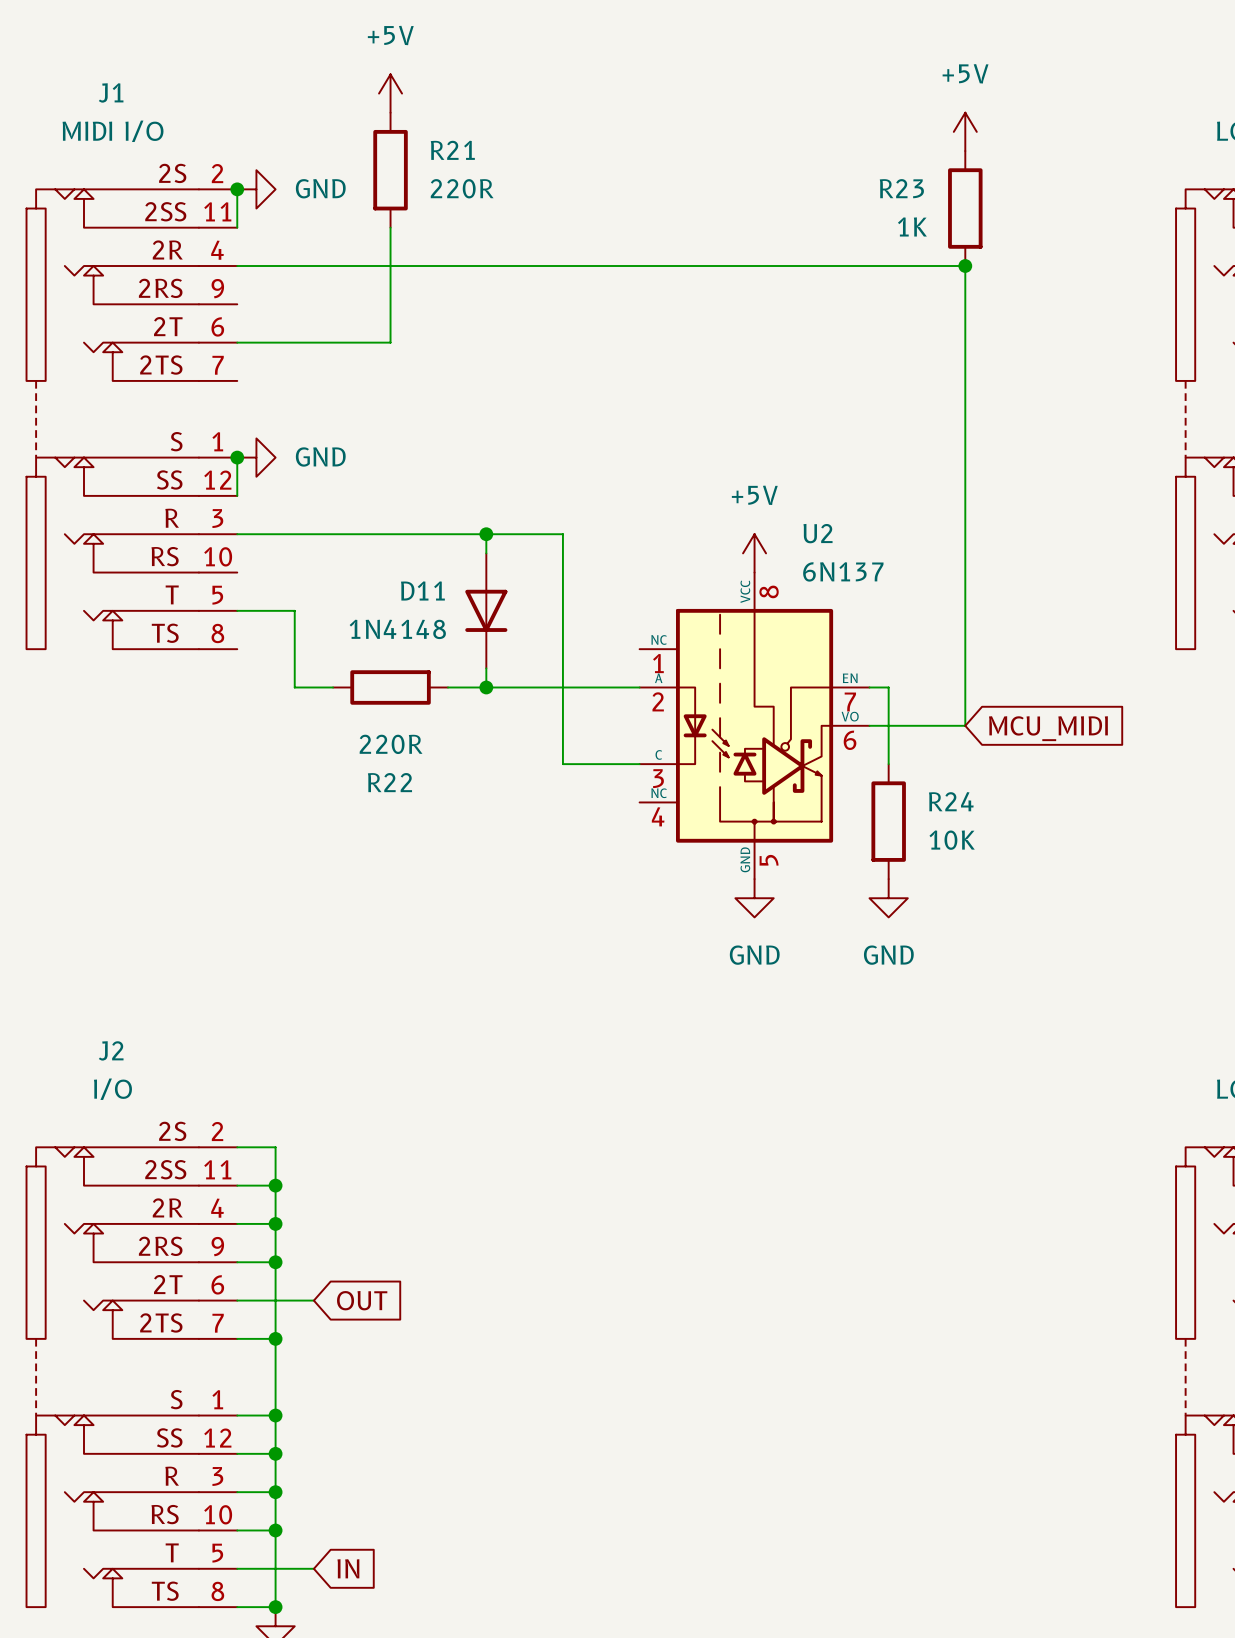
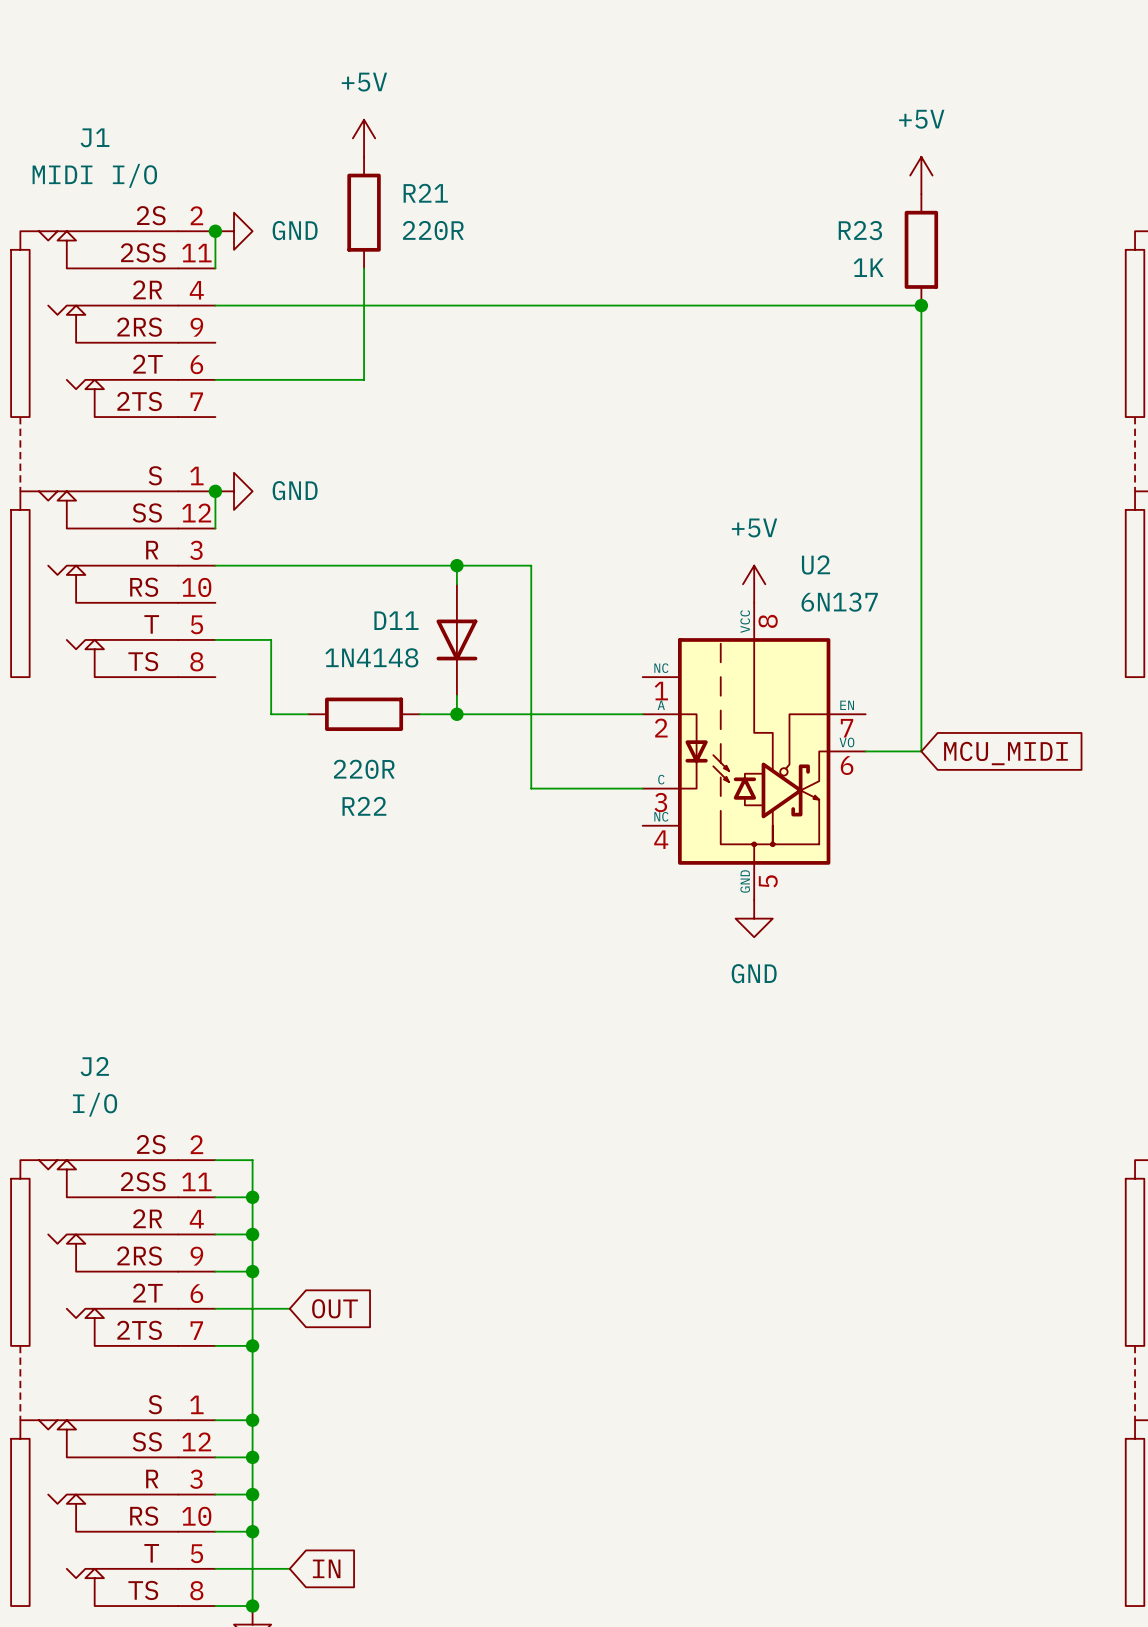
power symbol position: +5V (754, 553) -> +5V (754, 584)
wire: (869, 687) (888, 687) (888, 764) -> none
U2 position: (754, 725) -> (754, 751)
R24: 10K (888, 821) -> none
power symbol position: GND (754, 898) -> GND (754, 918)
power symbol: GND (888, 898) -> none

